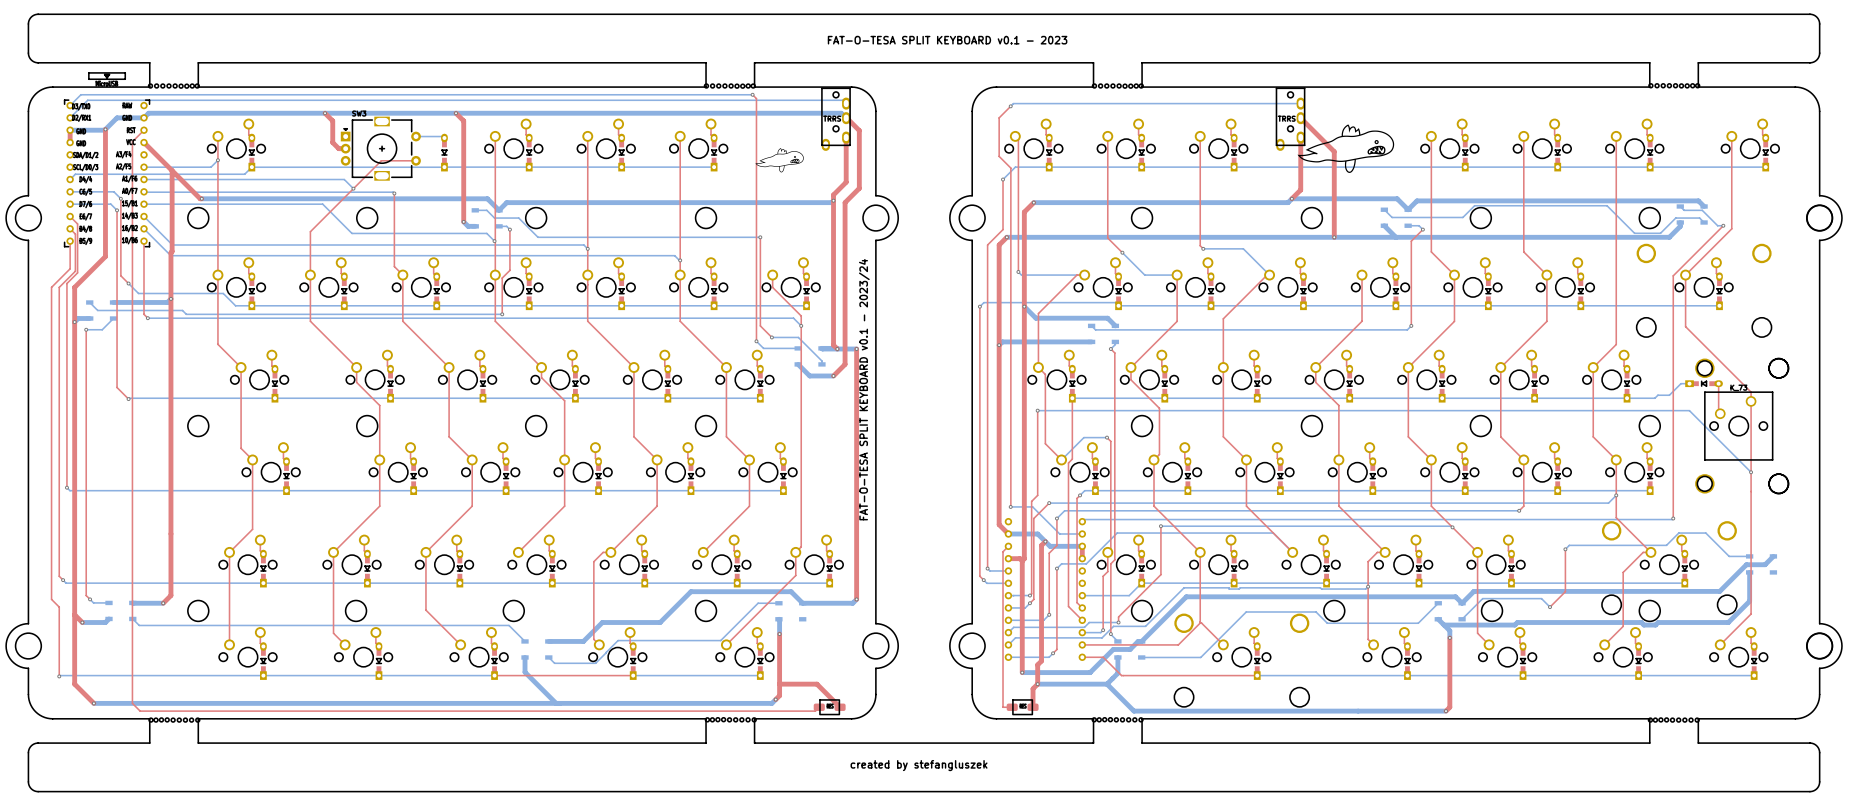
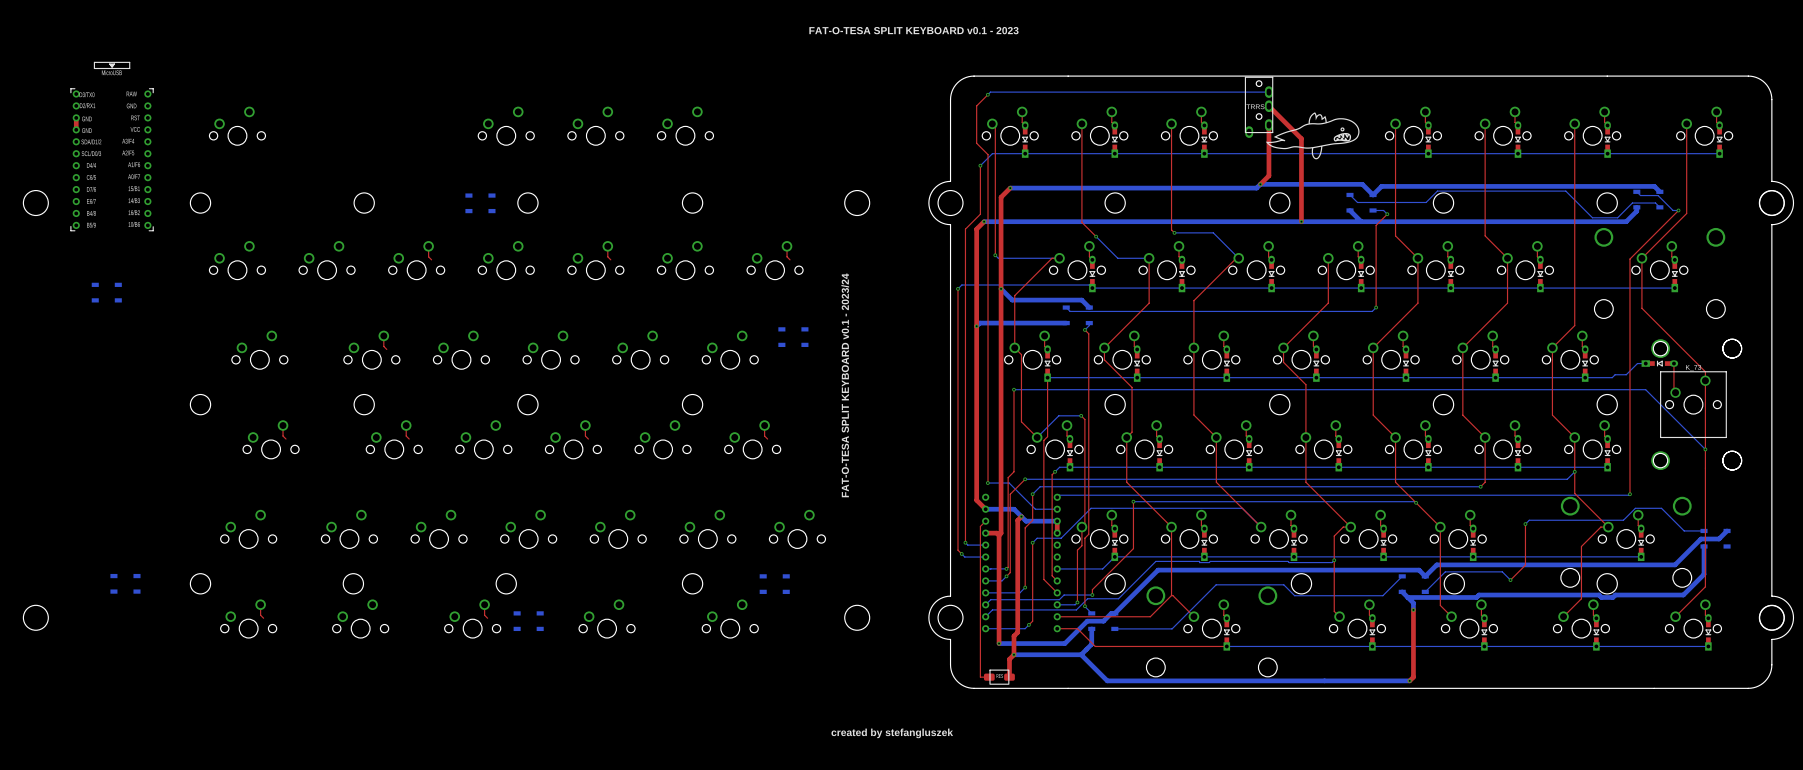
board edge: (198, 62) (706, 62) (706, 87) (198, 87) (198, 62) -> none
part: (1674, 85) -> none
part: (173, 86) -> none
part: (729, 86) -> none
part: (1117, 86) -> none
board edge: (1093, 87) (1093, 62) (754, 62) (754, 87) (854, 87) (868, 94) (875, 108) (875, 195) (890, 201) (896, 210) (898, 218) (892, 232) (886, 237) (875, 240) (875, 623) (886, 626) (894, 633) (898, 643) (897, 651) (890, 662) (875, 668) (875, 699) (872, 707) (864, 715) (851, 718) (754, 718) (754, 743) (1093, 743) (1093, 718) -> none
board edge: (1142, 87) (1142, 62) (1649, 62) (1649, 87) -> (1115, 76) (1068, 76)
board edge: (1698, 87) (1698, 62) (1815, 61) (1819, 54) (1818, 18) (1809, 14) (34, 14) (30, 17) (28, 23) (28, 54) (32, 61) (149, 62) (149, 87) (49, 87) (35, 94) (29, 105) (28, 195) (13, 201) (8, 207) (6, 218) (8, 228) (13, 234) (28, 240) (28, 623) (13, 629) (8, 635) (6, 646) (8, 656) (13, 662) (28, 668) (29, 699) (33, 709) (42, 716) (52, 718) (149, 718) (149, 743) (32, 744) (28, 751) (28, 782) (31, 788) (38, 791) (1809, 791) (1818, 787) (1819, 751) (1815, 744) (1698, 743) (1698, 718) -> (1654, 76) (1607, 76)
top track: (752, 94) (756, 98) (756, 341) -> none
bottom track: (752, 94) (80, 94) (70, 105) -> none
via: (752, 94) -> none
bottom track: (846, 103) (842, 100) (87, 100) (70, 117) -> none
top track: (325, 113) (332, 120) (332, 142) (338, 148) (345, 148) -> none
via: (325, 113) -> none
top track: (456, 113) (463, 120) (463, 221) -> none
via: (456, 113) -> none
top track: (846, 118) (859, 130) (859, 188) (845, 202) (845, 364) (833, 375) -> none
bottom track: (846, 118) (841, 113) (148, 113) (143, 117) (117, 117) (104, 130) (70, 130) -> none
part: (836, 119) -> none
top track: (248, 124) (248, 134) (251, 138) -> none
top track: (526, 124) (526, 134) (529, 138) -> none
top track: (618, 124) (618, 134) (621, 138) -> none
top track: (711, 124) (711, 134) (714, 138) -> none
top track: (105, 129) (105, 256) (74, 287) (74, 684) (93, 703) -> none
via: (105, 129) -> none
top track: (143, 130) (132, 141) (132, 703) (140, 711) (815, 711) (819, 707) -> none
top track: (217, 136) (217, 344) (241, 367) (241, 448) (252, 459) -> none
bottom track: (416, 136) (444, 138) -> none
top track: (495, 136) (495, 321) (541, 367) (541, 377) (564, 400) (564, 506) (518, 552) -> none
top track: (587, 136) (587, 284) -> none
top track: (680, 136) (680, 321) (726, 367) (726, 436) (749, 459) -> none
top track: (846, 137) (846, 182) (833, 194) (833, 345) (837, 349) -> none
top track: (143, 142) (201, 198) -> none
part: (380, 148) -> none
drawing: [755, 148, 804, 173] -> none
part: (251, 152) -> none
part: (444, 152) -> none
part: (529, 152) -> none
part: (621, 152) -> none
part: (714, 152) -> none
bottom track: (217, 160) (211, 167) (143, 167) -> none
via: (217, 160) -> none
top track: (416, 160) (381, 160) (310, 231) (310, 321) (356, 367) (356, 382) (379, 405) (379, 506) (333, 552) (333, 633) (345, 644) -> none
bottom track: (714, 167) (251, 167) (244, 174) (75, 174) (70, 179) -> none
top track: (172, 170) (170, 595) (163, 603) -> none
bottom track: (143, 179) (344, 179) (353, 188) -> none
via: (353, 188) -> none
bottom track: (70, 191) (113, 191) (120, 198) -> none
bottom track: (143, 191) (394, 193) -> none
top track: (394, 193) (394, 266) (402, 275) (402, 321) (449, 367) (449, 436) (472, 459) (472, 506) (425, 552) (425, 610) (460, 644) -> none
via: (394, 193) -> none
top track: (120, 198) (120, 275) (128, 283) -> none
via: (120, 198) -> none
bottom track: (201, 198) (487, 198) (499, 210) (506, 202) (831, 202) (833, 200) -> none
via: (201, 198) -> none
via: (833, 200) -> none
bottom track: (70, 204) (110, 204) (117, 210) -> none
bottom track: (143, 204) (322, 204) (352, 233) (486, 233) (494, 241) -> none
top track: (117, 210) (117, 387) (128, 399) -> none
via: (117, 210) -> none
bottom track: (475, 210) (486, 210) (494, 218) (518, 218) (538, 237) (760, 237) -> none
top track: (70, 216) (77, 223) (77, 272) (66, 283) (66, 487) -> none
bottom track: (143, 216) (172, 245) (583, 245) (587, 248) -> none
bottom track: (463, 221) (468, 226) (475, 226) -> none
via: (463, 221) -> none
bottom track: (499, 226) (506, 226) (509, 229) -> none
top track: (70, 228) (75, 234) (75, 271) (59, 287) (59, 576) (63, 580) -> none
bottom track: (143, 228) (170, 255) (674, 255) (680, 260) -> none
top track: (509, 229) (509, 270) (502, 278) (502, 314) -> none
via: (509, 229) -> none
top track: (760, 237) (760, 325) (771, 337) -> none
via: (760, 237) -> none
top track: (70, 241) (70, 268) (51, 287) (51, 599) (59, 607) (59, 676) -> none
top track: (143, 241) (143, 314) (147, 318) -> none
via: (494, 241) -> none
via: (587, 248) -> none
via: (680, 260) -> none
top track: (248, 262) (248, 273) (251, 276) -> none
top track: (341, 262) (341, 273) (344, 276) -> none
top track: (526, 262) (526, 273) (529, 276) -> none
top track: (711, 262) (711, 273) (714, 276) -> none
top track: (772, 275) (772, 287) (801, 316) (801, 546) (795, 552) (795, 575) (726, 644) -> none
bottom track: (128, 283) (138, 293) (223, 293) (235, 305) (806, 305) -> none
via: (128, 283) -> none
top track: (587, 284) (587, 321) (633, 367) (633, 436) (657, 459) (657, 506) (610, 552) (603, 552) (593, 561) (593, 639) (599, 644) -> none
part: (251, 291) -> none
part: (344, 291) -> none
part: (436, 291) -> none
part: (529, 291) -> none
part: (621, 291) -> none
part: (714, 291) -> none
part: (806, 291) -> none
bottom track: (170, 298) (167, 302) (113, 302) -> none
via: (170, 298) -> none
bottom track: (89, 302) (97, 310) (182, 310) (186, 314) (502, 314) -> none
via: (502, 314) -> none
bottom track: (89, 318) (78, 318) (74, 322) -> none
bottom track: (113, 318) (102, 329) (86, 329) -> none
bottom track: (147, 318) (793, 318) (801, 325) -> none
via: (147, 318) -> none
via: (74, 322) -> none
via: (801, 325) -> none
top track: (86, 329) (86, 595) (90, 599) -> none
via: (86, 329) -> none
bottom track: (771, 337) (798, 337) (821, 361) (821, 364) -> none
via: (771, 337) -> none
bottom track: (756, 341) (763, 348) (798, 348) -> none
via: (756, 341) -> none
bottom track: (837, 349) (836, 348) (821, 348) (822, 349) (856, 349) -> none
via: (837, 349) -> none
top track: (856, 349) (856, 599) -> none
via: (856, 349) -> none
top track: (271, 355) (271, 366) (274, 369) -> none
top track: (479, 355) (479, 366) (482, 369) -> none
top track: (572, 355) (572, 366) (575, 369) -> none
top track: (664, 355) (664, 366) (667, 369) -> none
top track: (757, 355) (757, 366) (760, 369) -> none
bottom track: (798, 364) (809, 375) (833, 375) -> none
via: (833, 375) -> none
part: (274, 383) -> none
part: (390, 383) -> none
part: (482, 383) -> none
part: (575, 383) -> none
part: (667, 383) -> none
part: (760, 383) -> none
bottom track: (760, 398) (128, 399) -> none
via: (128, 399) -> none
top track: (503, 447) (503, 458) (506, 461) -> none
top track: (687, 447) (687, 458) (690, 461) -> none
top track: (252, 460) (252, 529) (229, 552) (229, 644) -> none
top track: (749, 460) (749, 506) (703, 552) -> none
part: (286, 476) -> none
part: (413, 476) -> none
part: (506, 476) -> none
part: (598, 476) -> none
part: (690, 476) -> none
part: (783, 476) -> none
bottom track: (66, 487) (69, 490) (783, 490) -> none
via: (66, 487) -> none
top track: (260, 540) (260, 550) (263, 554) -> none
top track: (364, 540) (364, 550) (367, 554) -> none
top track: (456, 540) (456, 550) (459, 554) -> none
top track: (549, 540) (549, 550) (552, 554) -> none
top track: (641, 540) (641, 550) (644, 554) -> none
top track: (734, 540) (734, 550) (737, 554) -> none
top track: (826, 540) (826, 550) (829, 554) -> none
part: (263, 568) -> none
part: (367, 568) -> none
part: (459, 568) -> none
part: (552, 568) -> none
part: (644, 568) -> none
part: (737, 568) -> none
part: (829, 568) -> none
bottom track: (63, 580) (66, 583) (829, 583) -> none
via: (63, 580) -> none
bottom track: (90, 599) (93, 602) (108, 602) -> none
via: (90, 599) -> none
bottom track: (856, 599) (852, 603) (802, 603) (791, 591) (690, 591) (660, 622) (602, 622) (583, 641) (548, 641) -> none
via: (856, 599) -> none
bottom track: (132, 602) (163, 603) -> none
via: (163, 603) -> none
bottom track: (778, 603) (758, 603) (720, 640) (618, 640) (595, 663) (554, 663) (548, 657) -> none
top track: (74, 614) (82, 622) -> none
bottom track: (108, 618) (105, 622) (82, 622) -> none
bottom track: (132, 618) (139, 625) (509, 625) (525, 641) -> none
bottom track: (778, 619) (779, 634) -> none
via: (82, 622) -> none
top track: (375, 632) (375, 643) (378, 646) -> none
top track: (630, 632) (630, 643) (633, 646) -> none
top track: (757, 632) (757, 643) (760, 646) -> none
top track: (779, 634) (779, 695) (775, 699) -> none
via: (779, 634) -> none
bottom track: (525, 657) (525, 672) (556, 703) -> none
part: (263, 661) -> none
part: (378, 661) -> none
part: (494, 661) -> none
part: (633, 661) -> none
part: (760, 661) -> none
top track: (494, 675) (633, 675) -> none
bottom track: (494, 675) (59, 676) -> none
bottom track: (633, 675) (760, 675) -> none
via: (59, 676) -> none
top track: (779, 684) (816, 684) (840, 707) -> none
bottom track: (775, 699) (771, 703) (93, 703) -> none
via: (775, 699) -> none
via: (93, 703) -> none
part: (829, 707) -> none
board edge: (198, 718) (706, 718) (706, 743) (198, 743) (198, 718) -> none
board edge: (1142, 718) (1142, 743) (1649, 743) (1649, 718) -> (1115, 688) (1068, 688)
board edge: none -> (1607, 688) (1654, 688)
part: (730, 719) -> none
part: (1117, 719) -> none
part: (174, 720) -> none
part: (1673, 720) -> none

